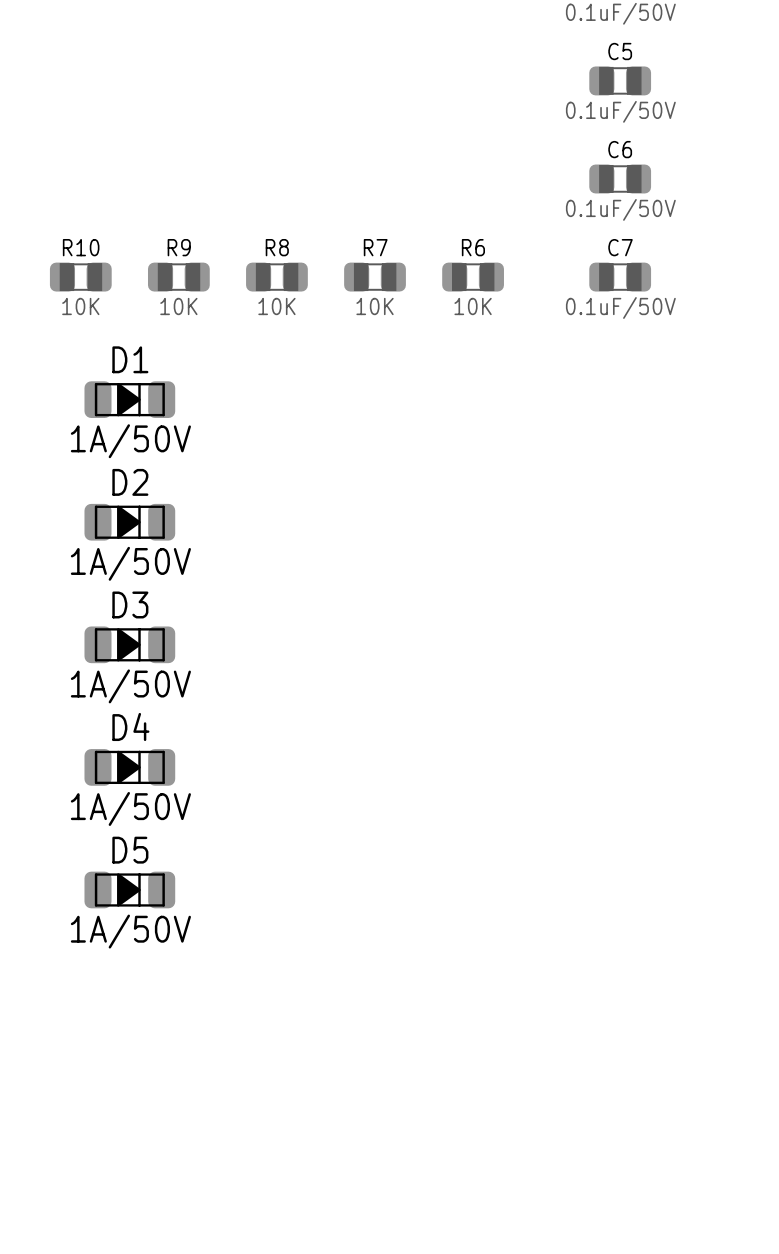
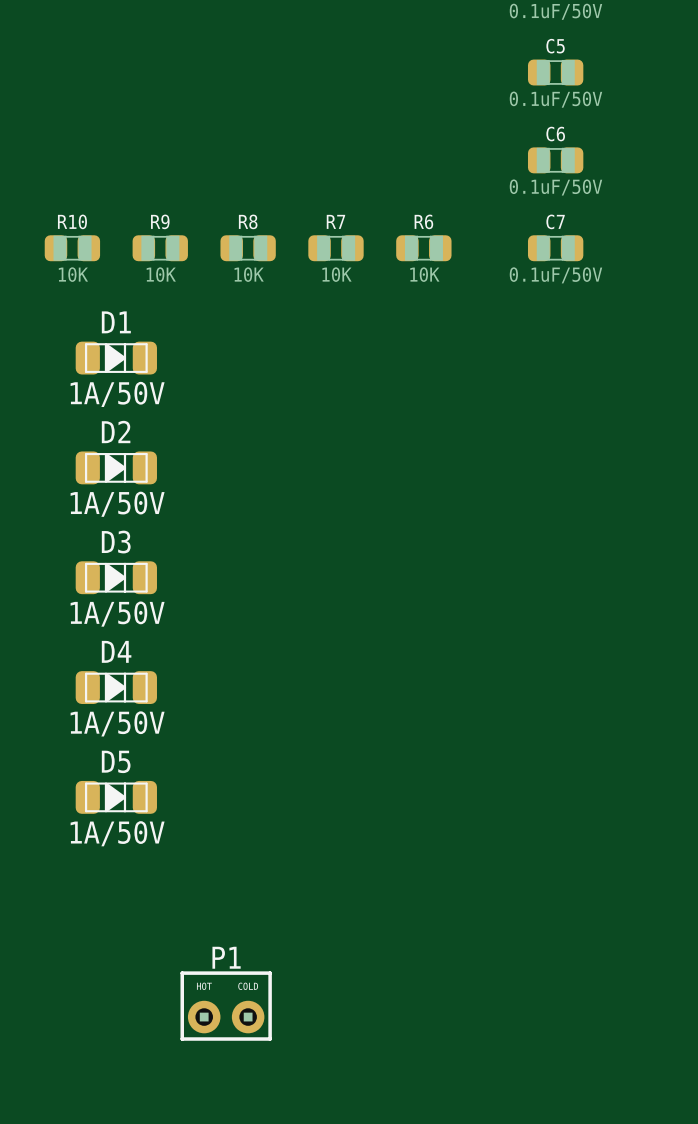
P1: none -> (226, 1006)

